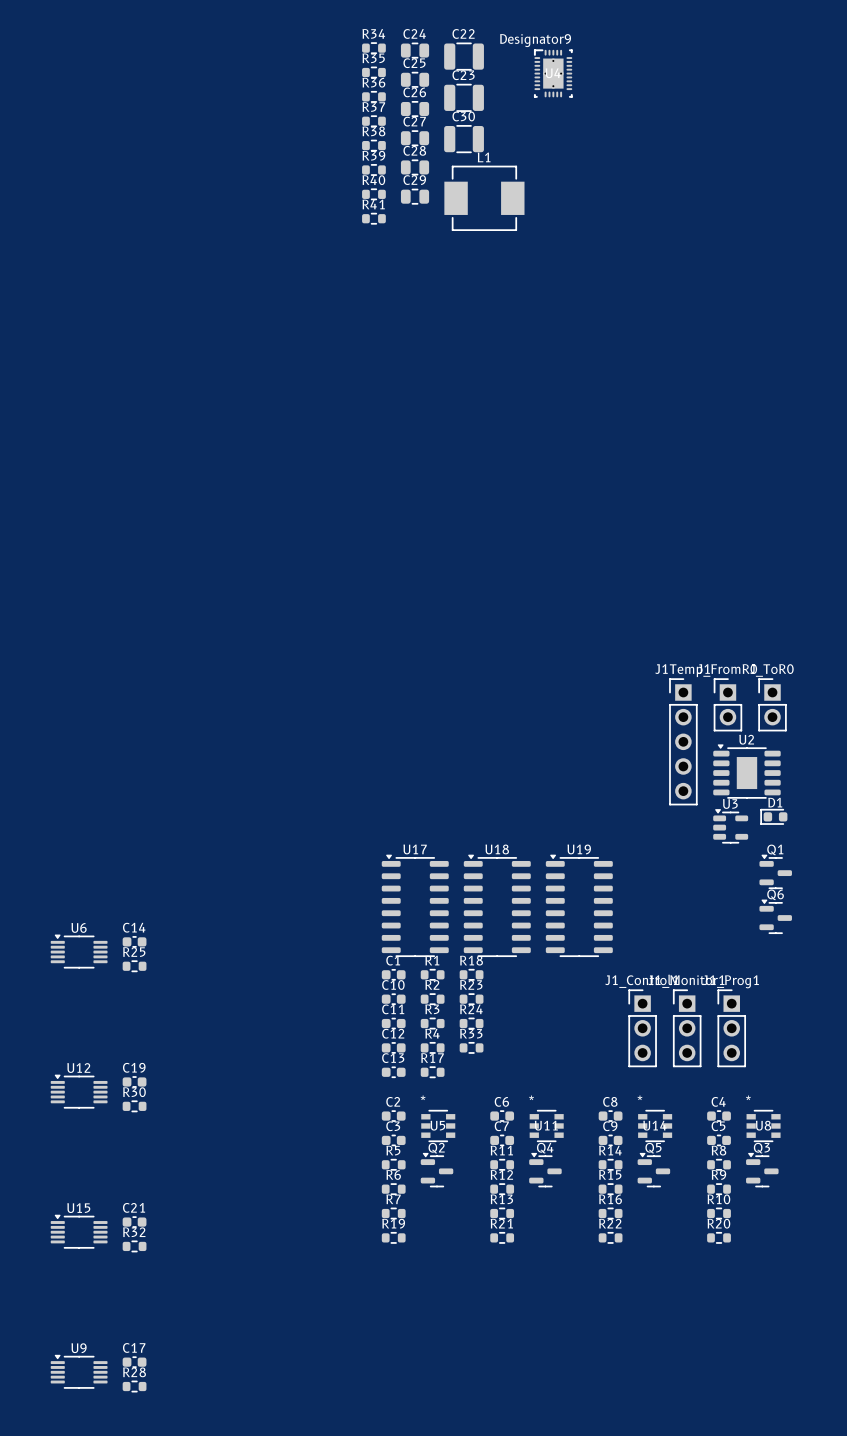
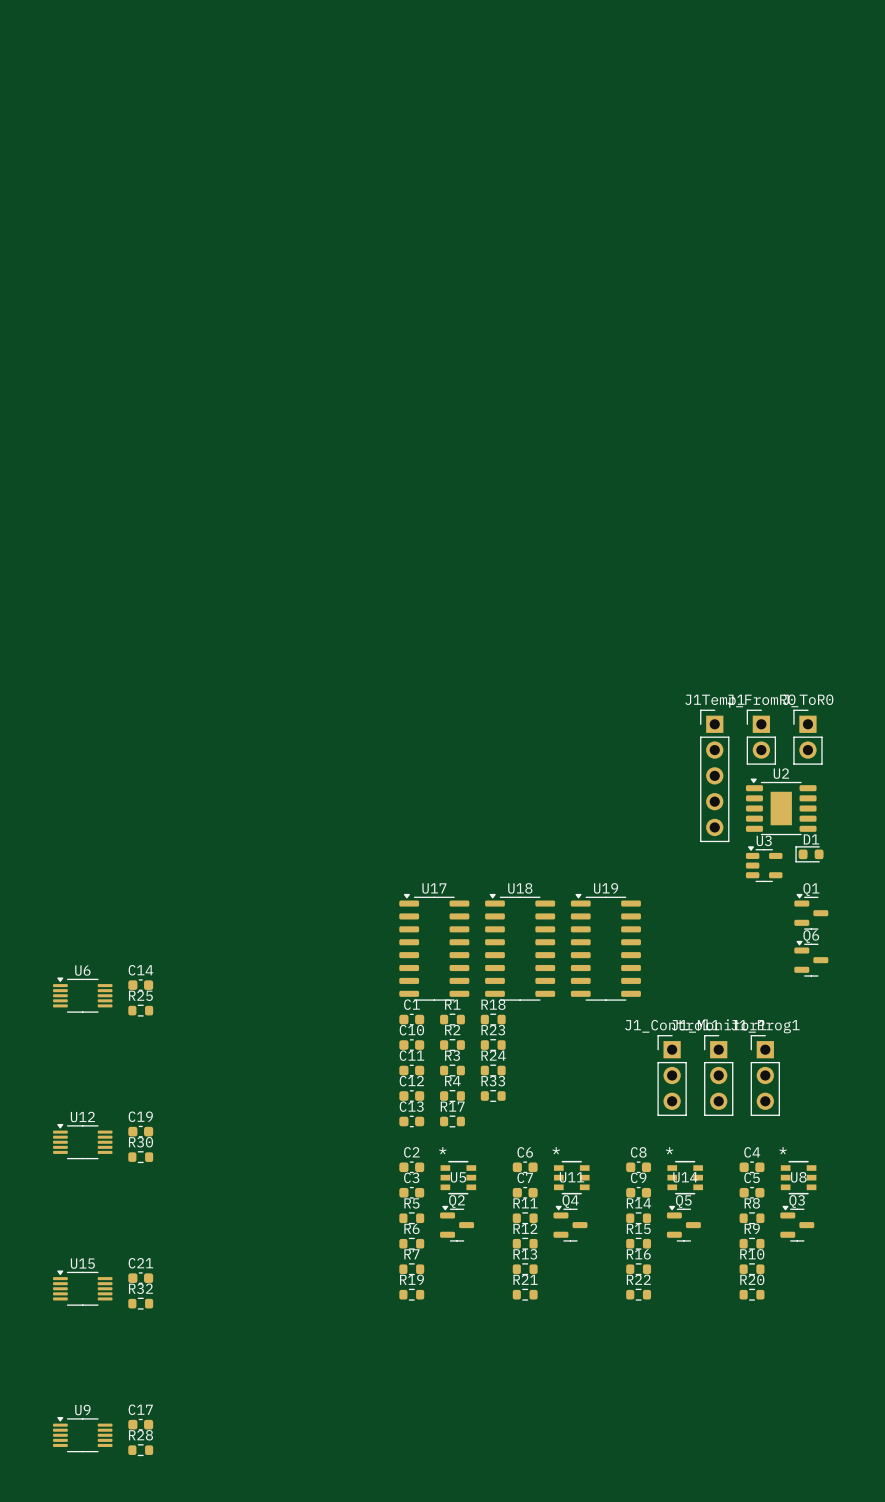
R34: (373, 48) -> none
C24: (415, 50) -> none
C22: (464, 56) -> none
R35: (373, 72) -> none
part: (553, 73) -> none
C25: (415, 79) -> none
R36: (373, 96) -> none
C23: (464, 97) -> none
C26: (415, 109) -> none
R37: (373, 121) -> none
C27: (415, 138) -> none
C30: (464, 139) -> none
R38: (373, 145) -> none
C28: (415, 167) -> none
R39: (373, 169) -> none
R40: (373, 194) -> none
C29: (415, 196) -> none
L1: (484, 198) -> none
R41: (373, 218) -> none

